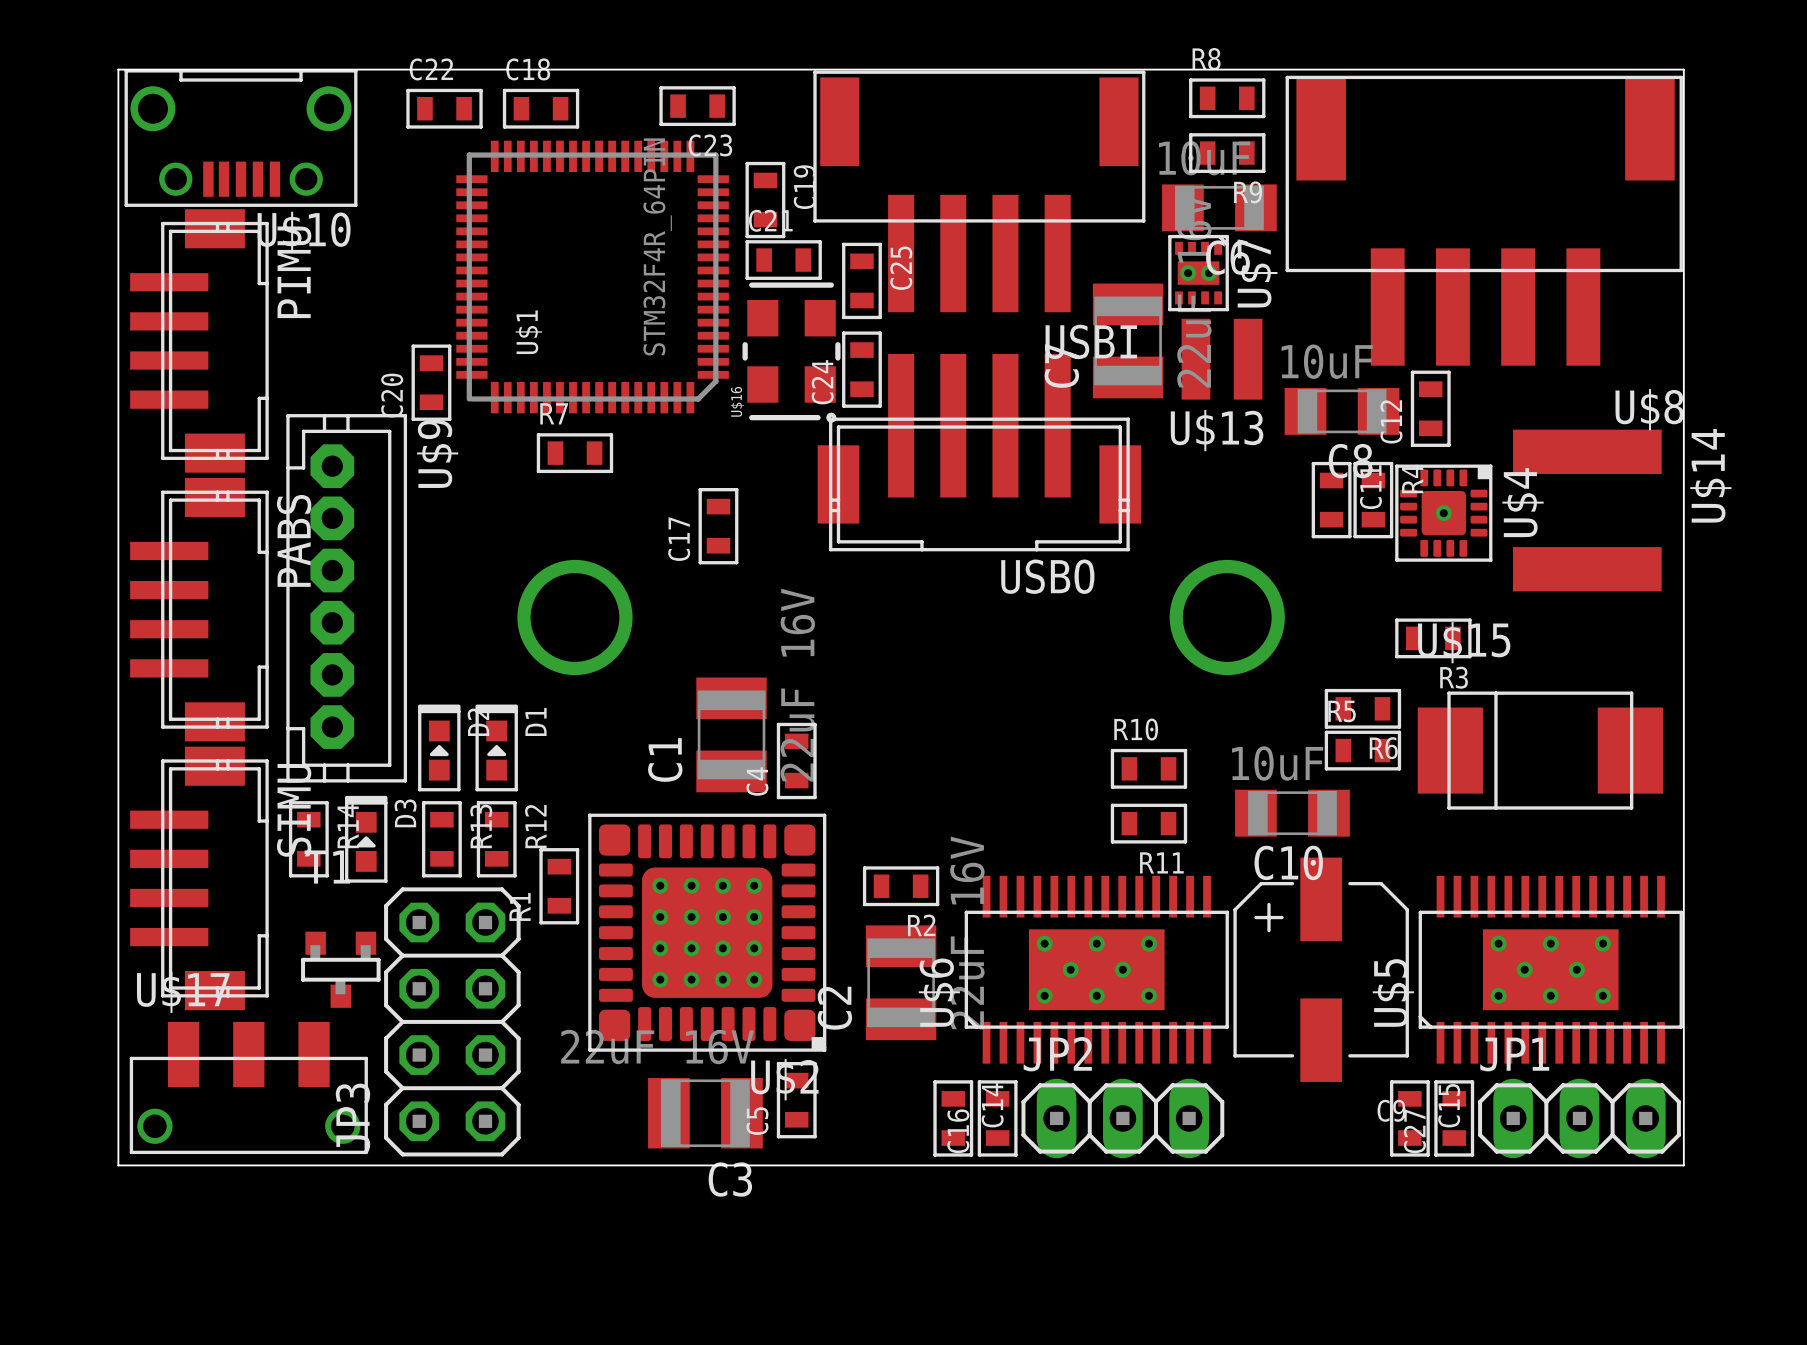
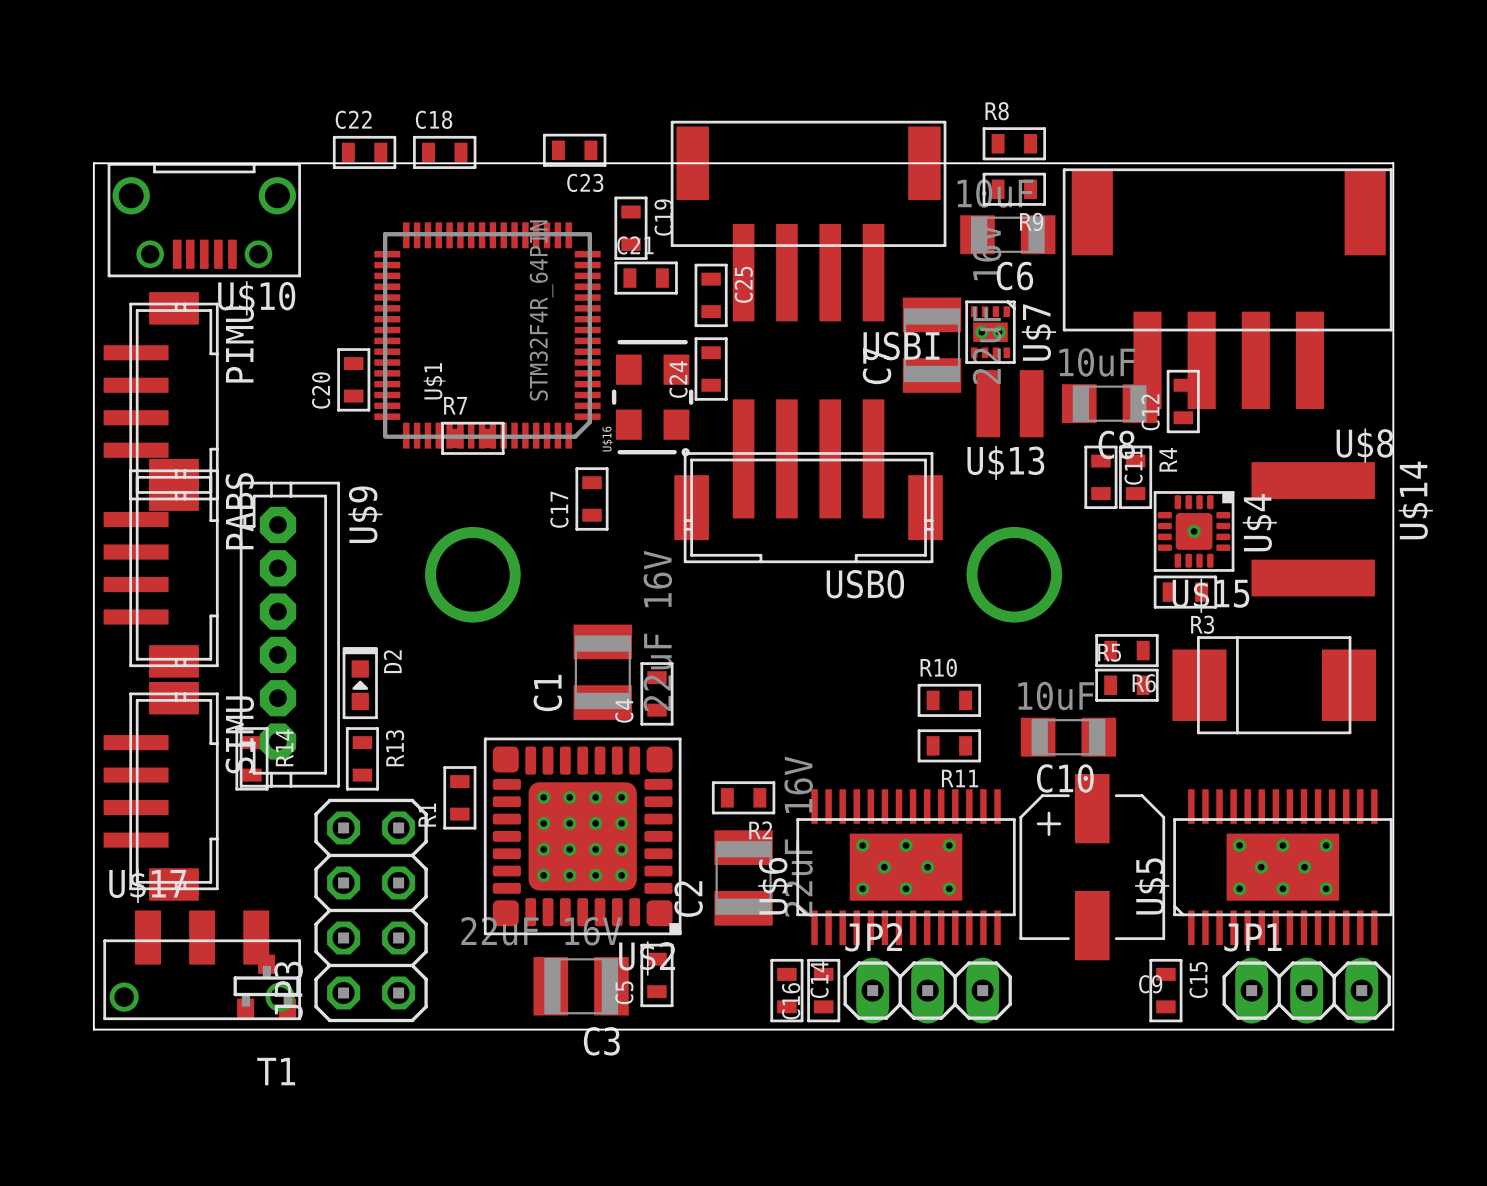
board edge: (118, 121) (118, 69) (1683, 69) (1683, 121) -> (93, 163) (1393, 163)
U$10 position: (241, 138) -> (204, 220)
U$8 position: (1484, 220) -> (1227, 288)
U$7 position: (1198, 273) -> (990, 332)
U$1 position: (592, 277) -> (487, 335)
PIMU position: (199, 340) -> (161, 401)
U$16 position: (791, 352) -> (652, 398)
U$13 position: (1222, 359) -> (1009, 403)
USBO position: (979, 452) -> (808, 481)
U$14 position: (1587, 510) -> (1313, 529)
U$4 position: (1443, 513) -> (1194, 531)
U$9 position: (346, 598) -> (289, 634)
D1: (496, 747) -> none
D3: (366, 839) -> none
R12: (496, 839) -> none
T1 rotation: 0° (340, 969) -> 180° (266, 986)
T1 position: (340, 969) -> (266, 986)
C27: (1454, 1118) -> none

